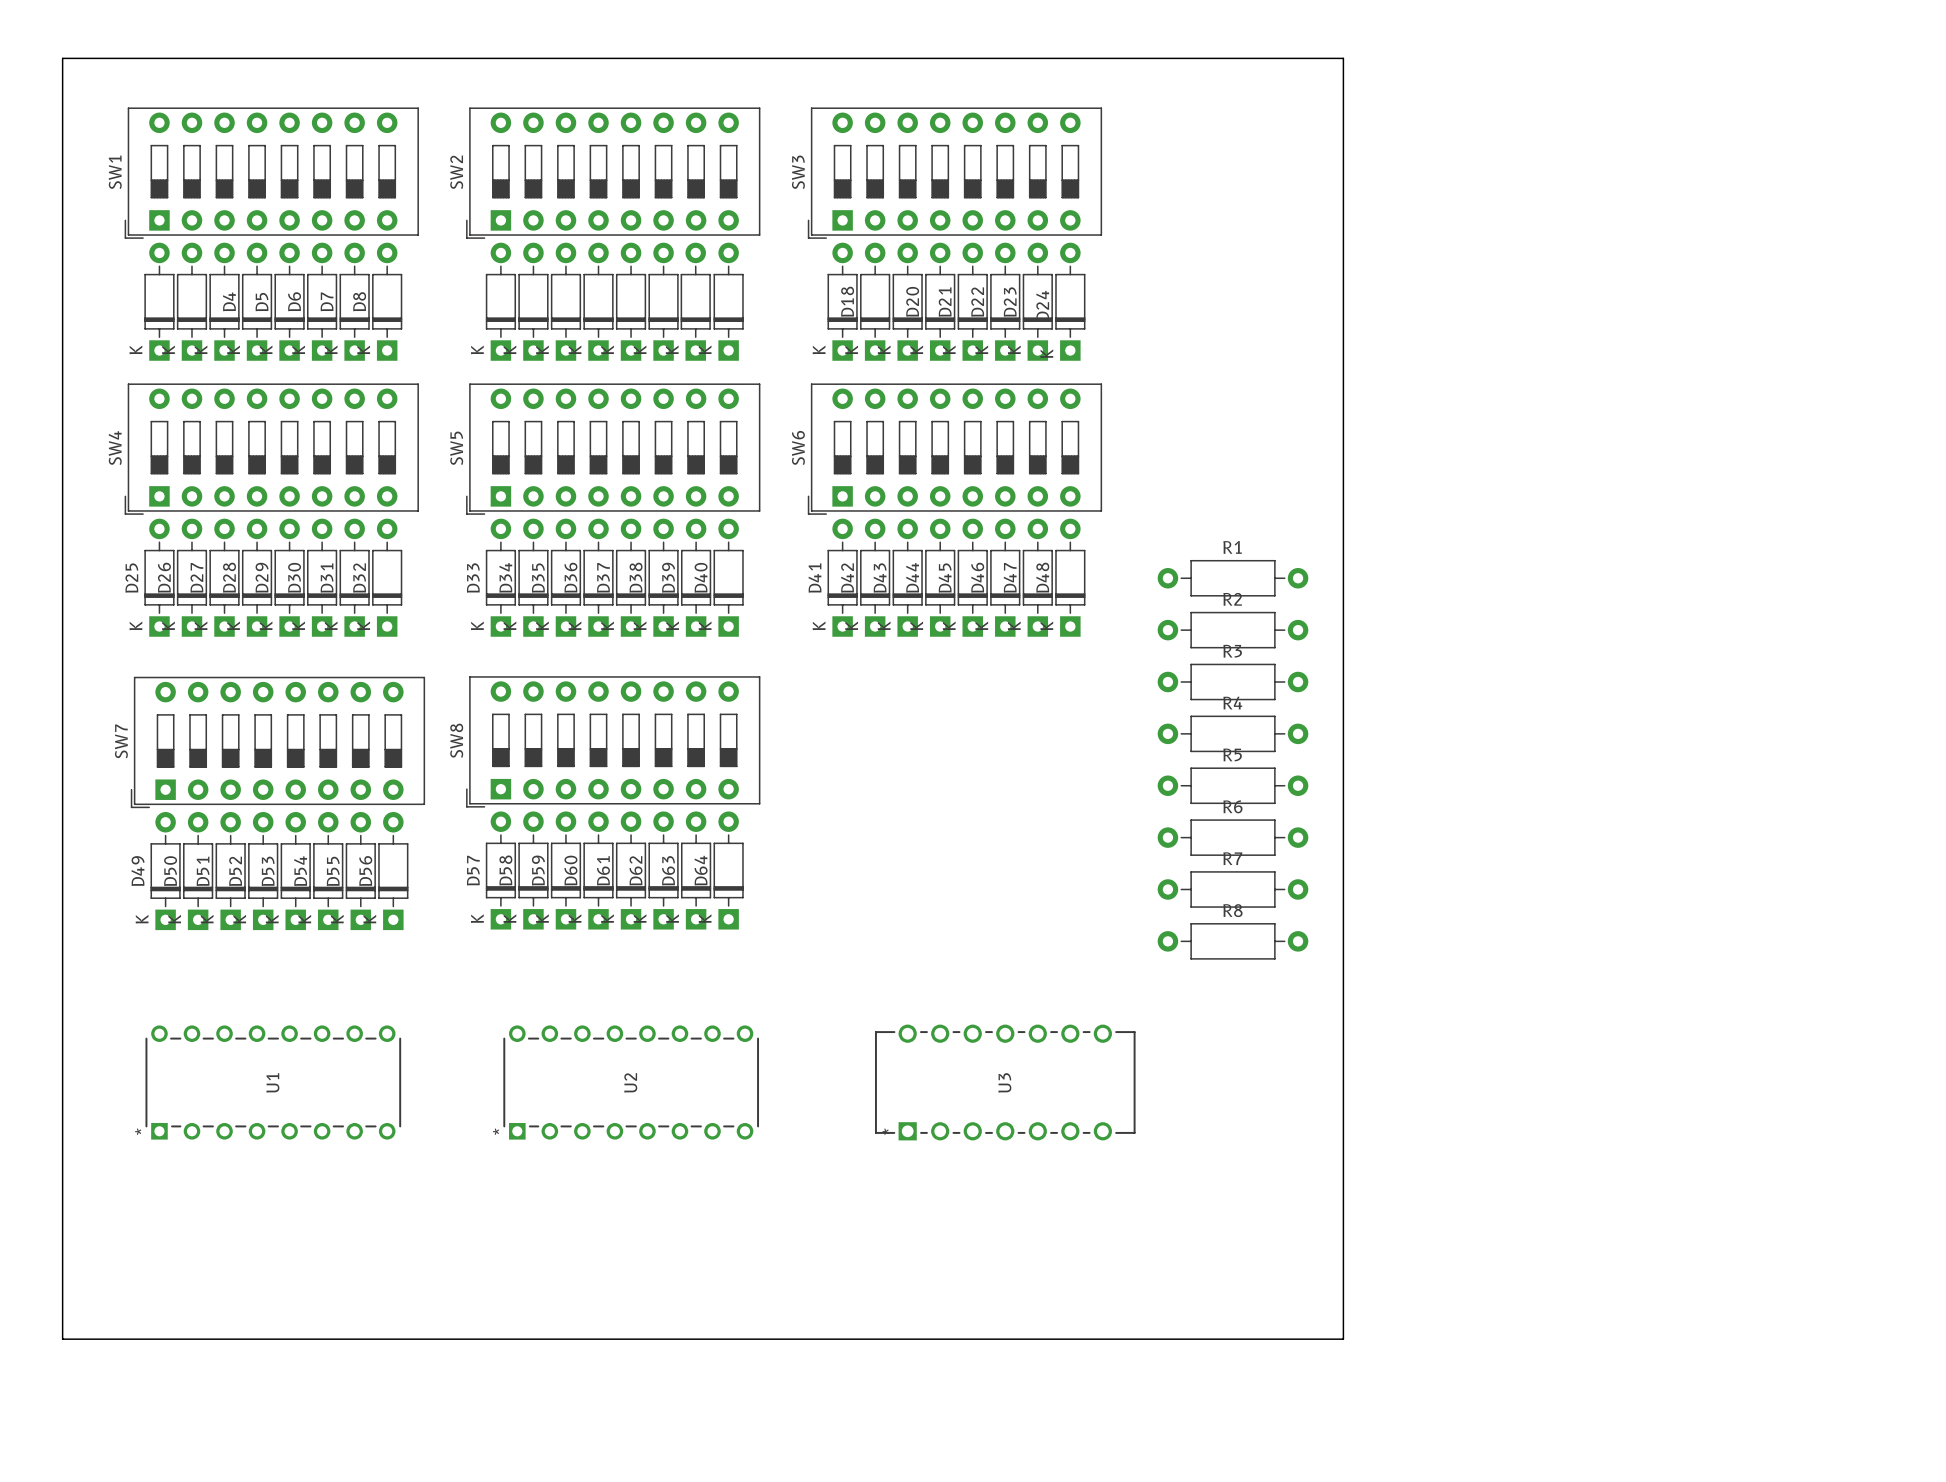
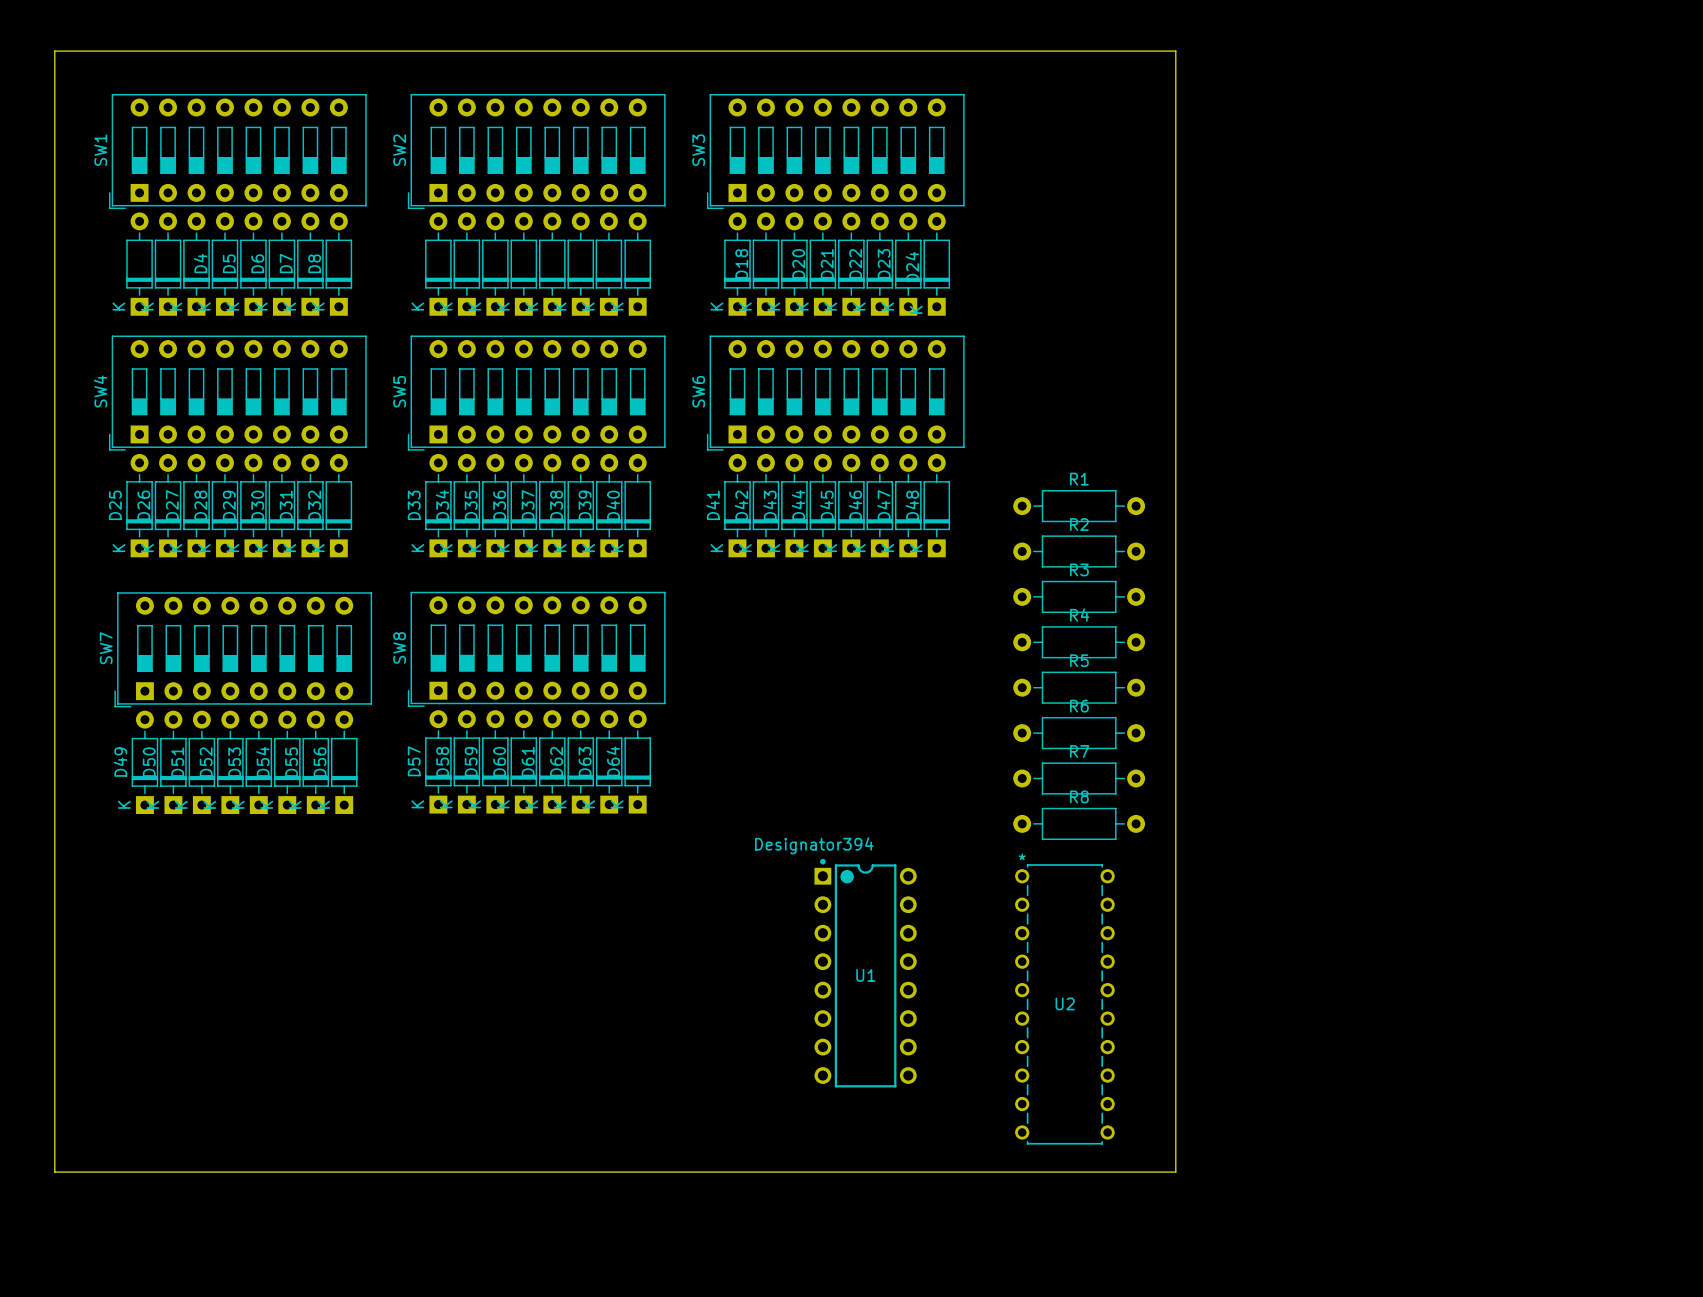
U1 footprint: [145, 1025, 402, 1140] -> [814, 858, 917, 1088]
U2 footprint: [503, 1025, 760, 1140] -> [1015, 864, 1115, 1145]
U3: (1005, 1082) -> none

